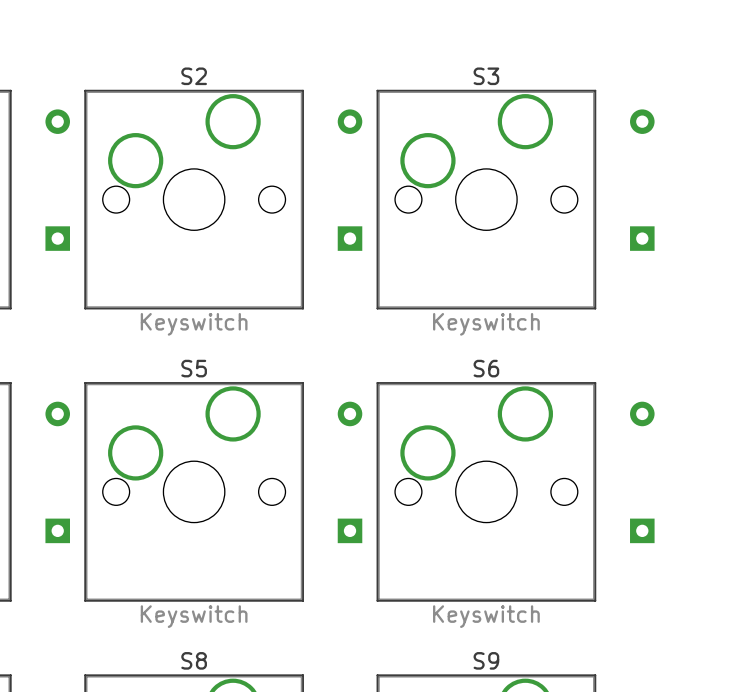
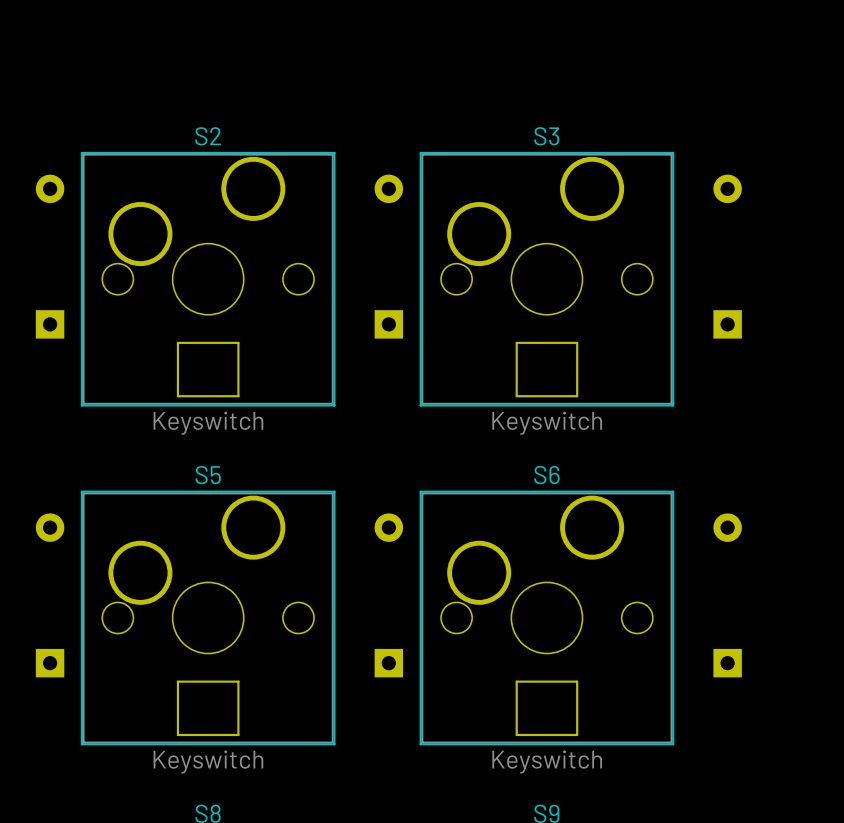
part: none -> (208, 369)
part: none -> (546, 369)
part: none -> (208, 708)
part: none -> (546, 708)

